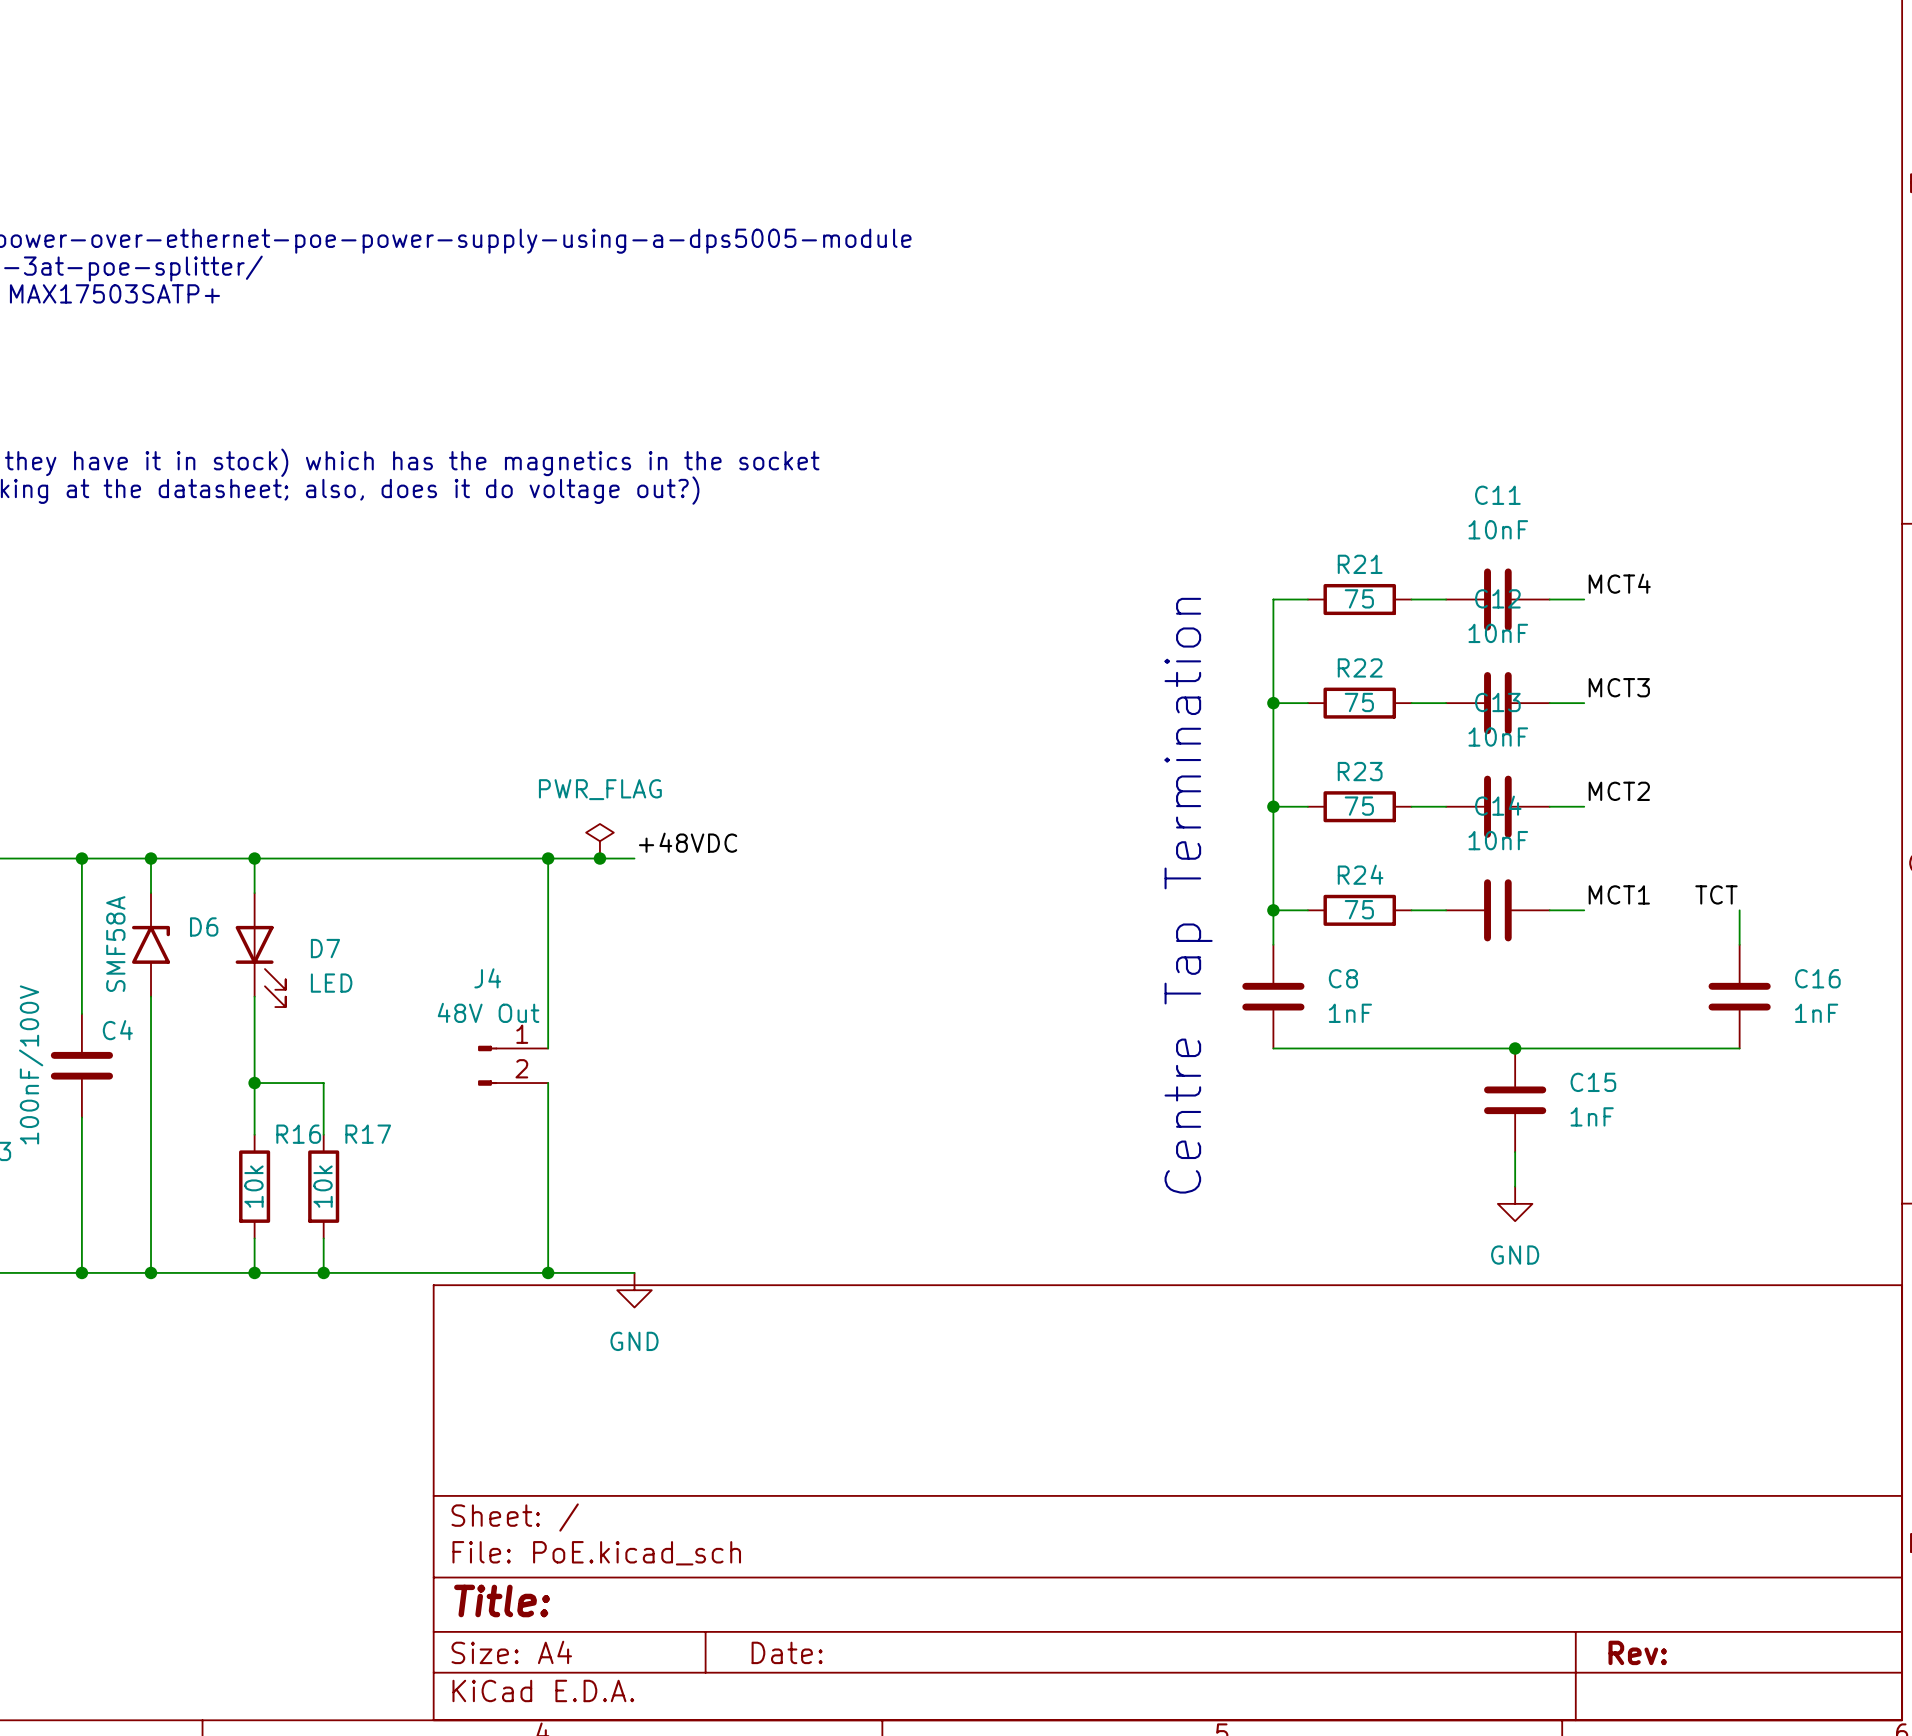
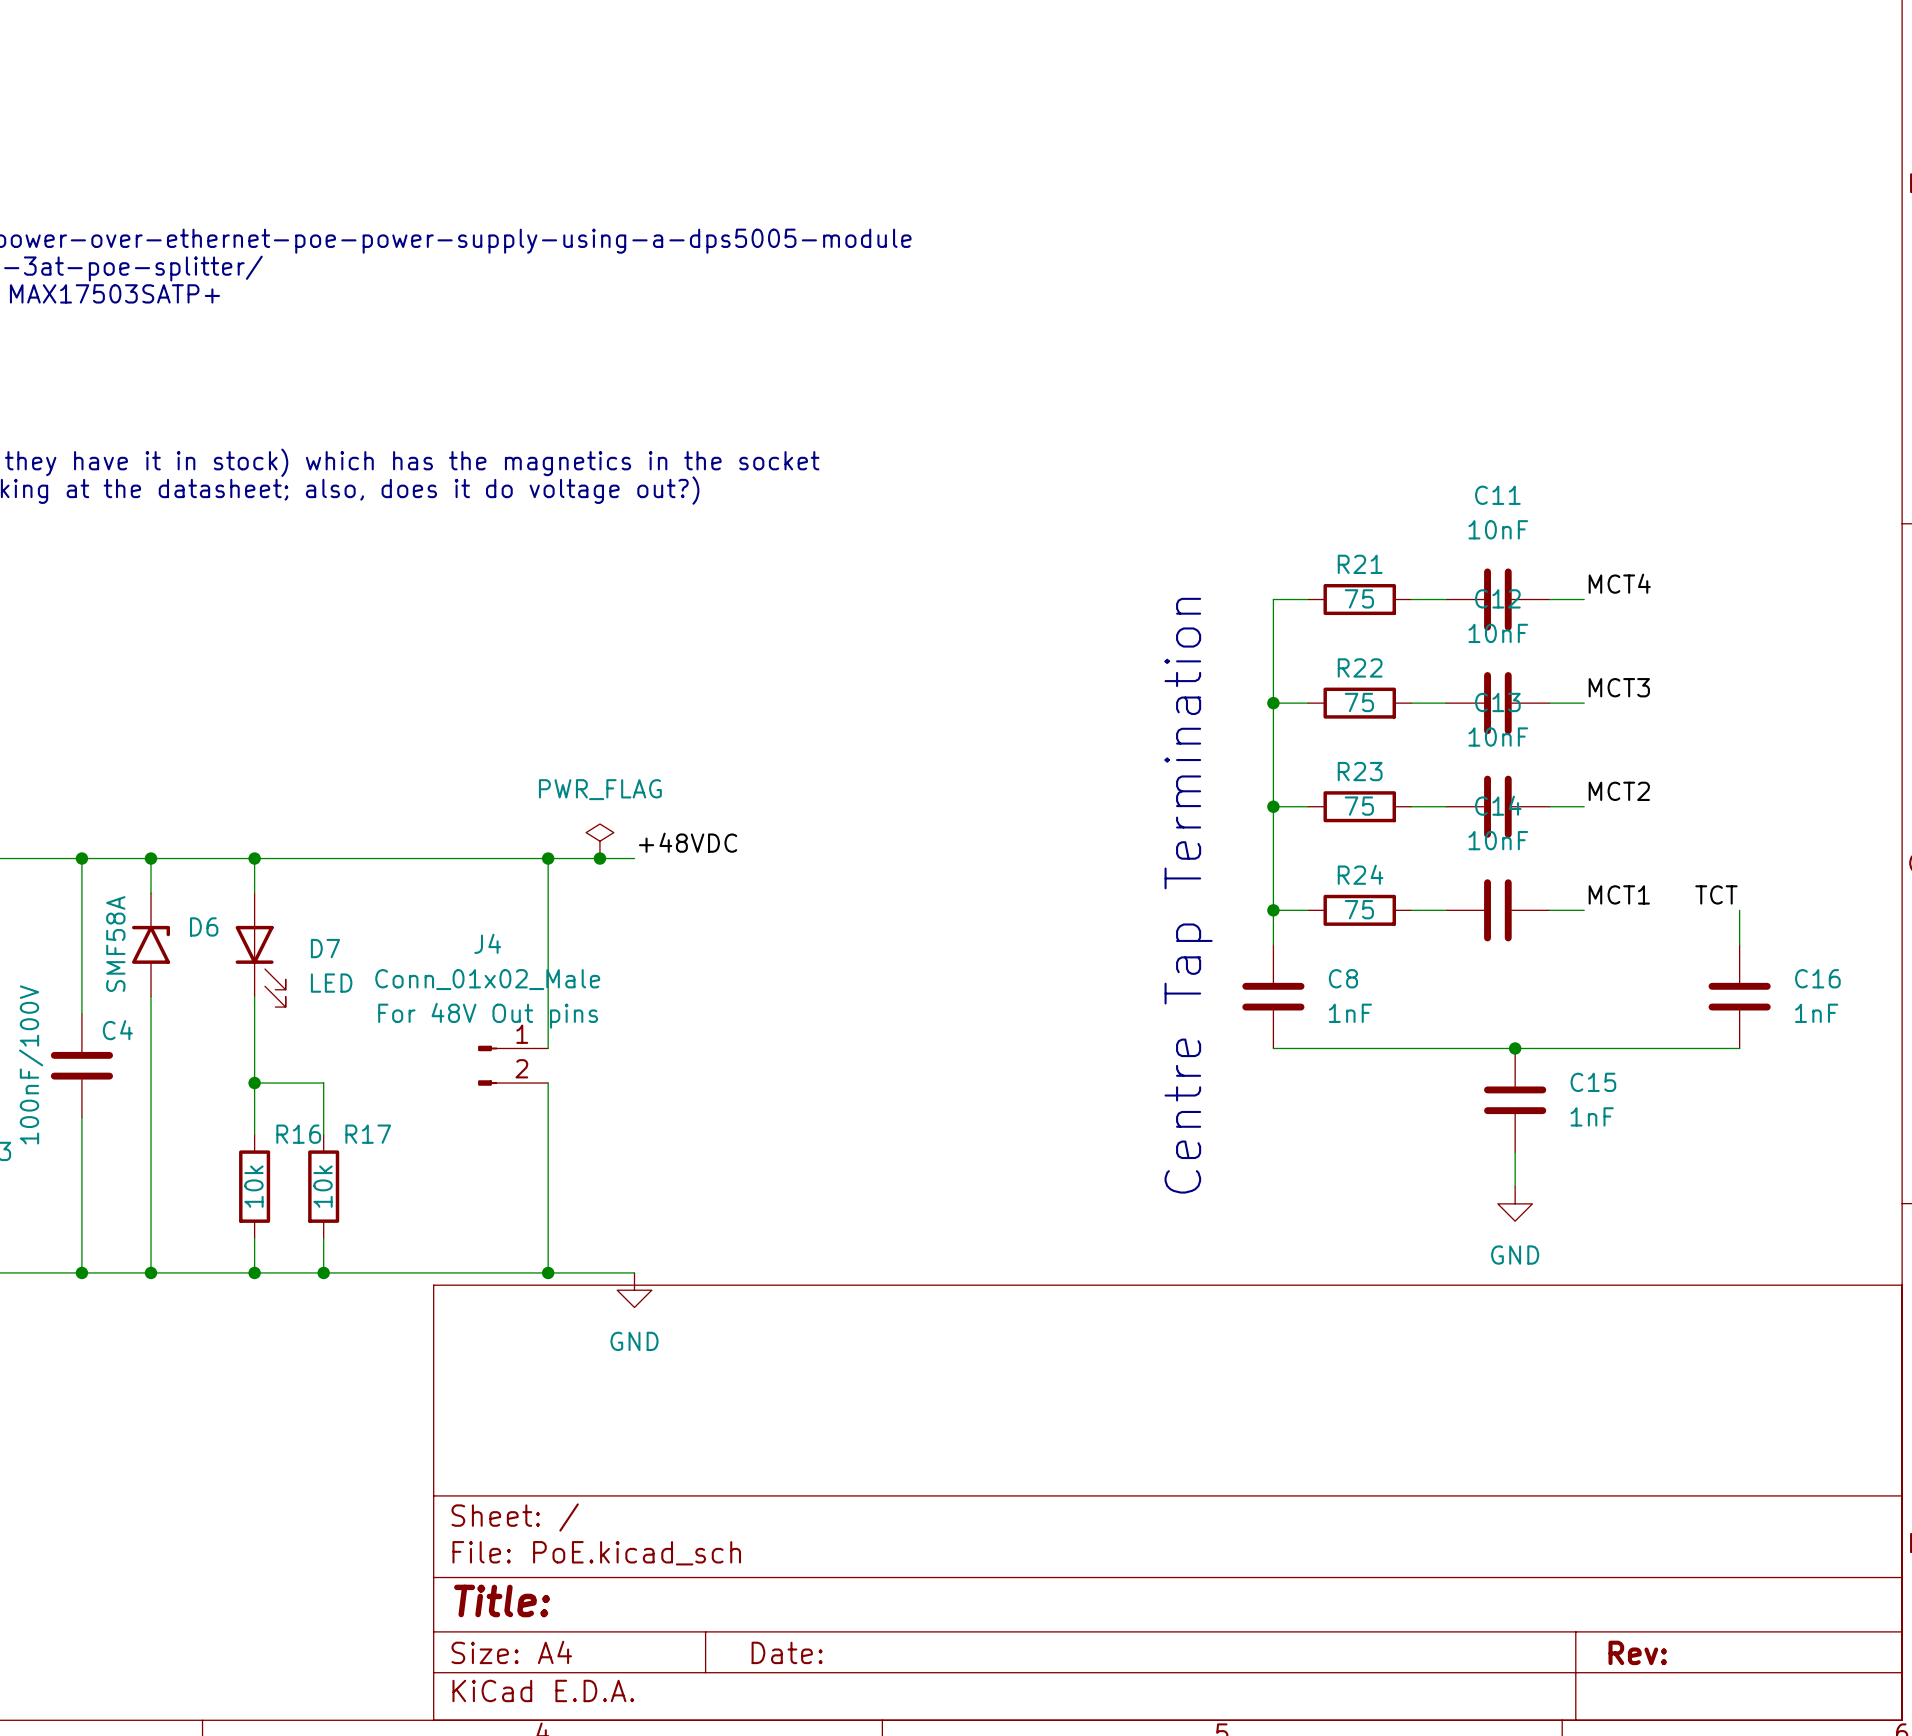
J4 name position: J4 (487, 978) -> J4 (487, 943)
J4 value: 48V Out (488, 1012) -> Conn_01x02_Male (487, 979)
J4 text: none -> For 48V Out pins (488, 1015)

